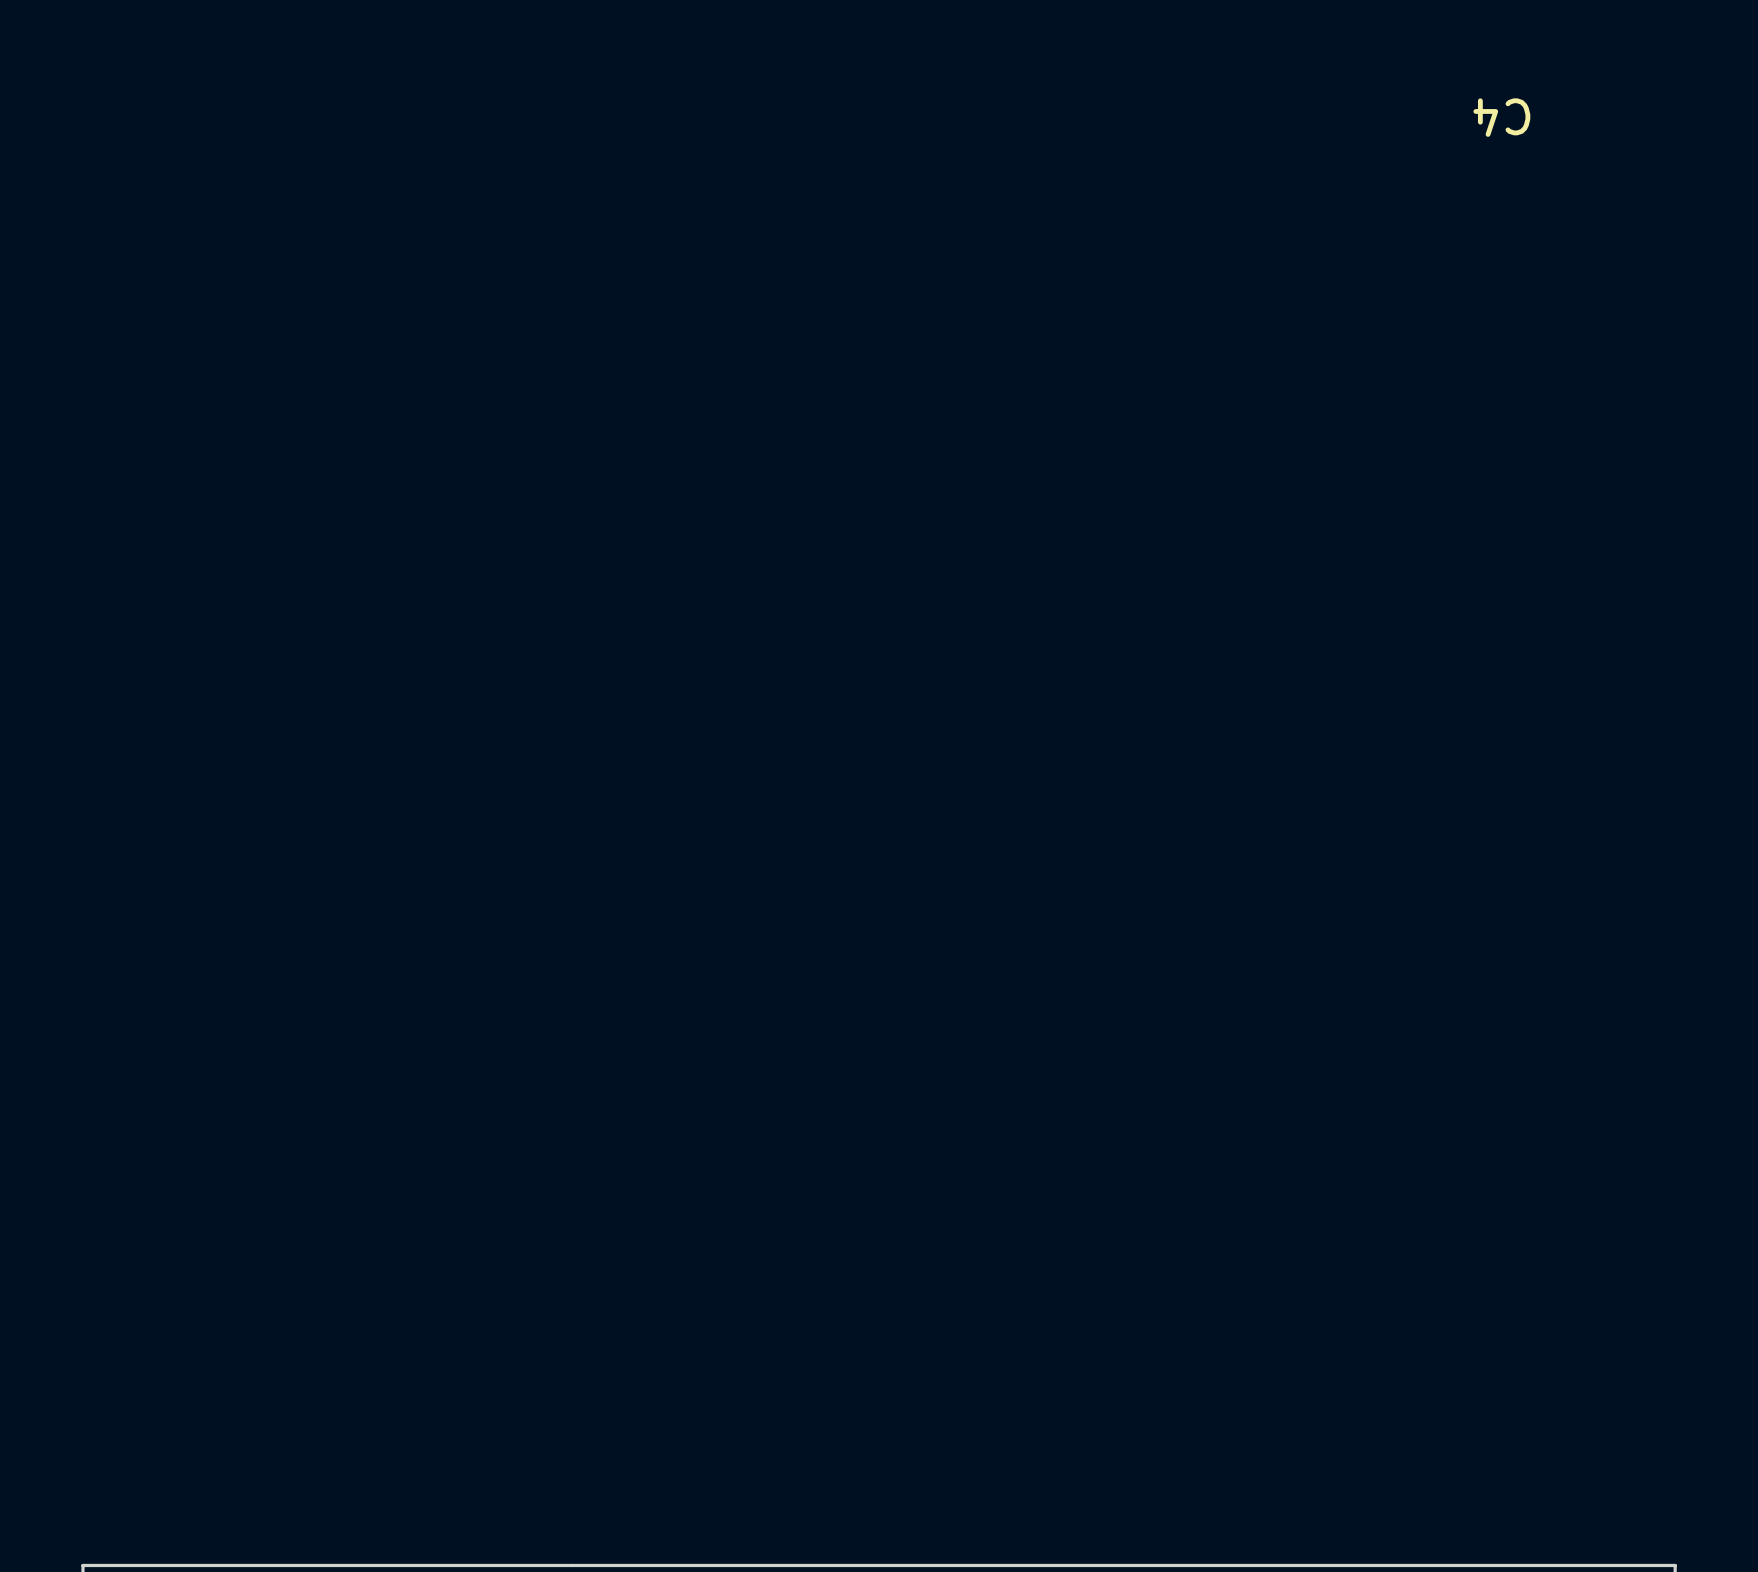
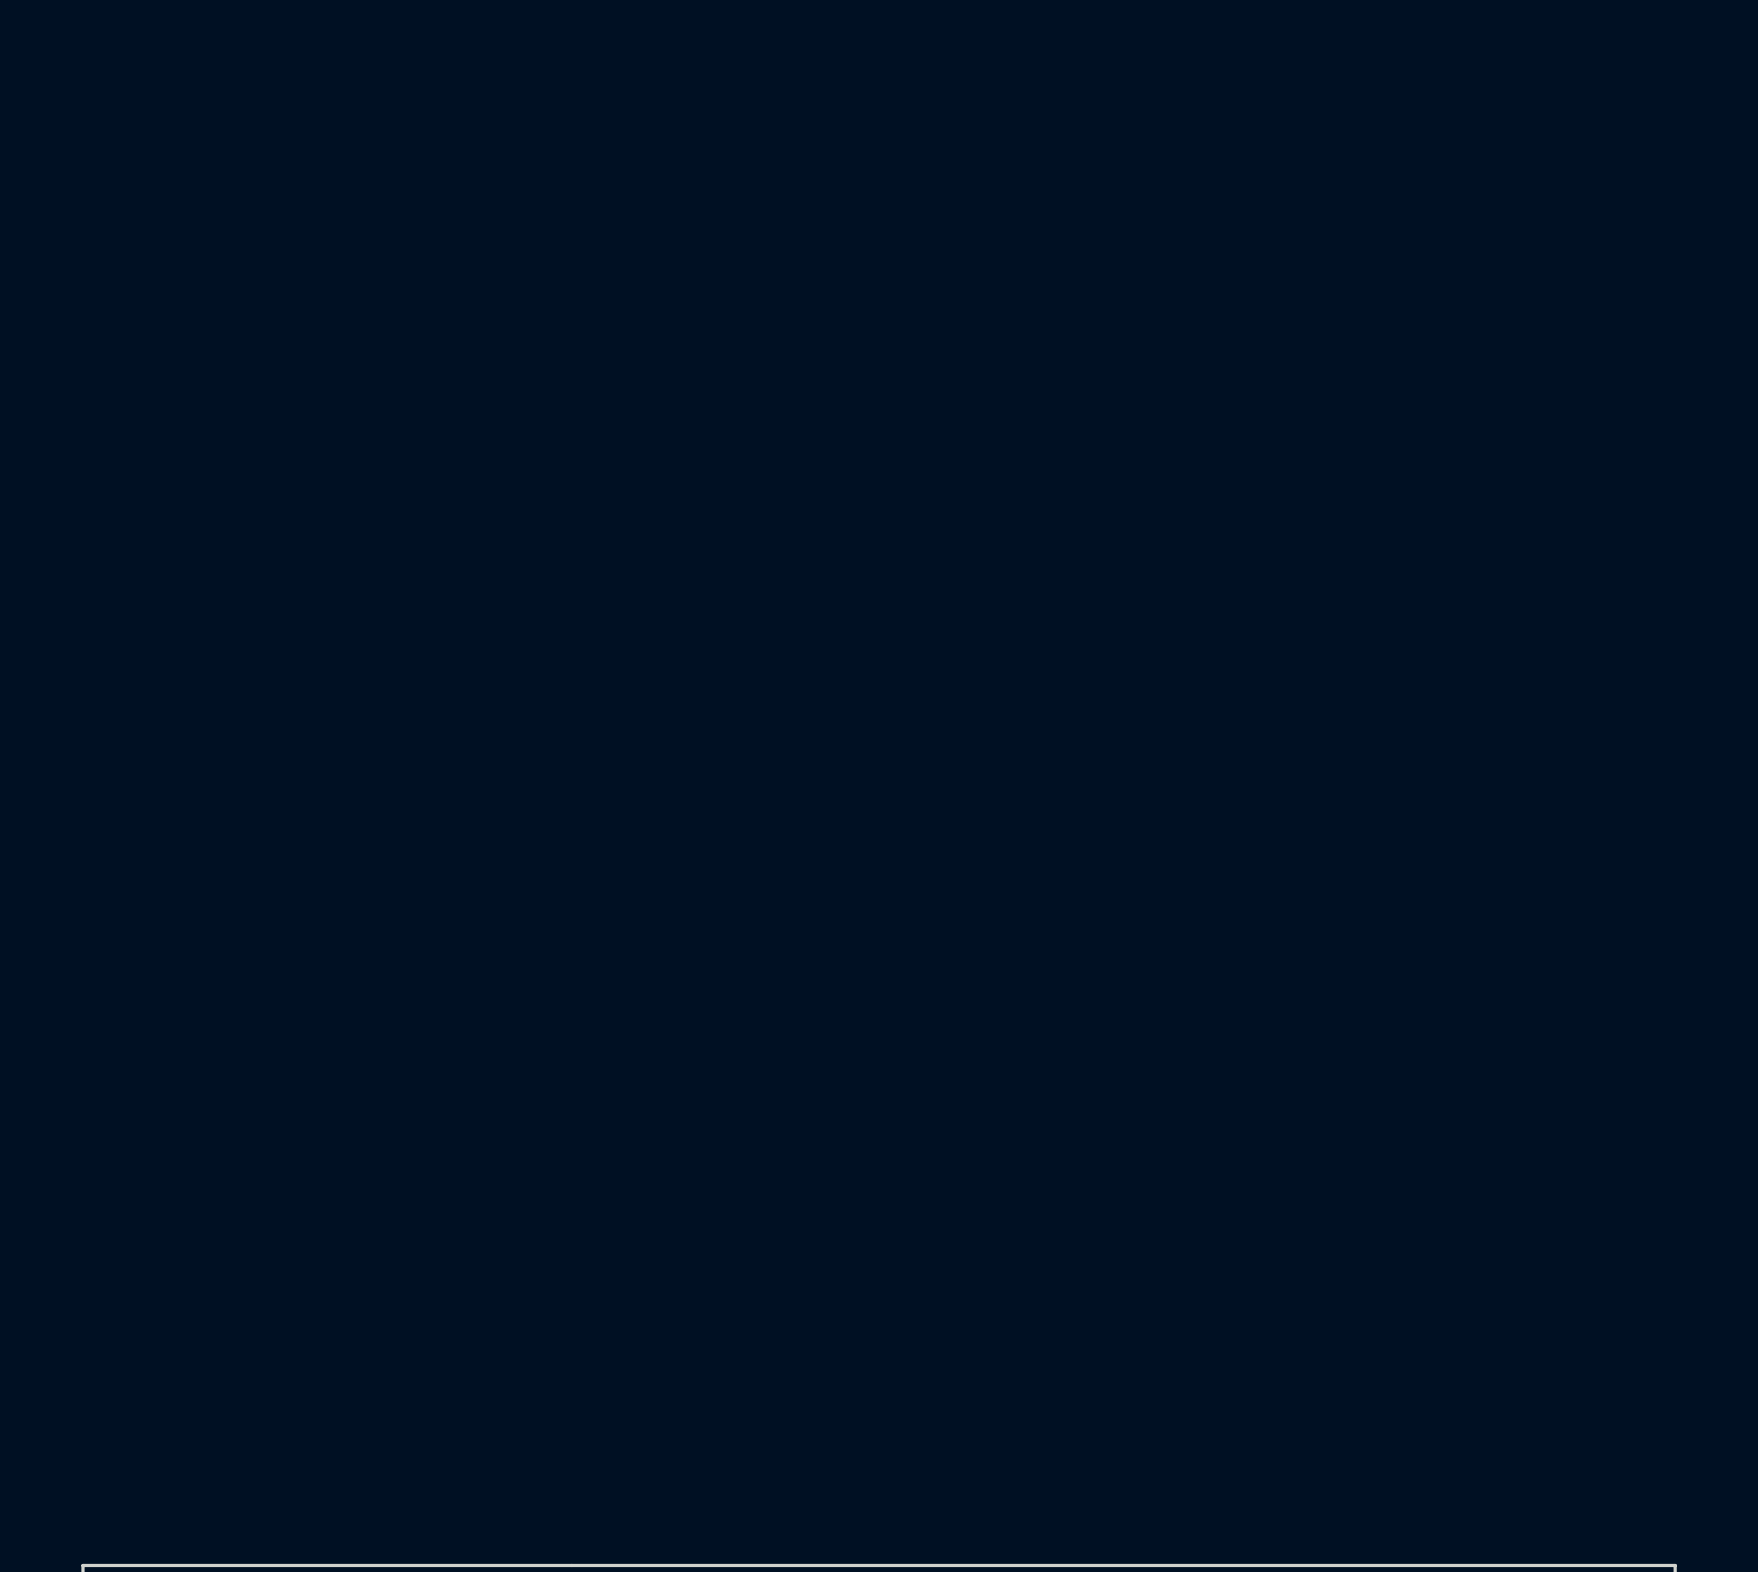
text: C4 (1501, 117) -> none

